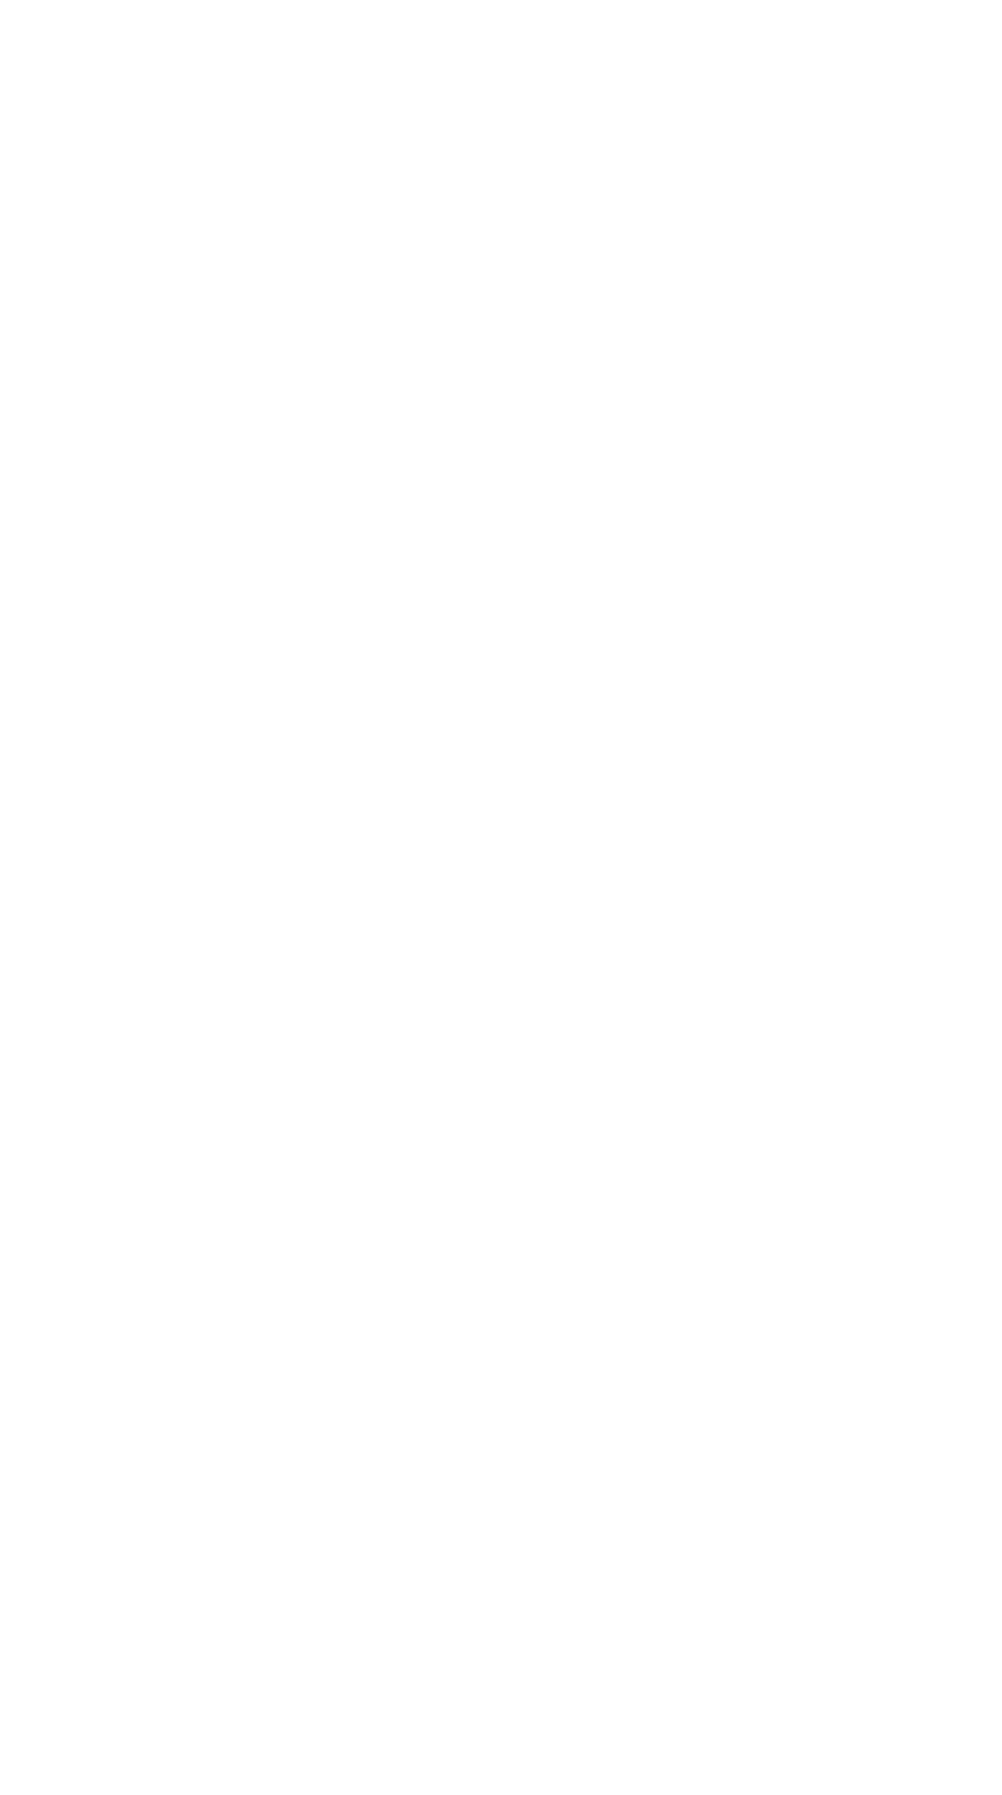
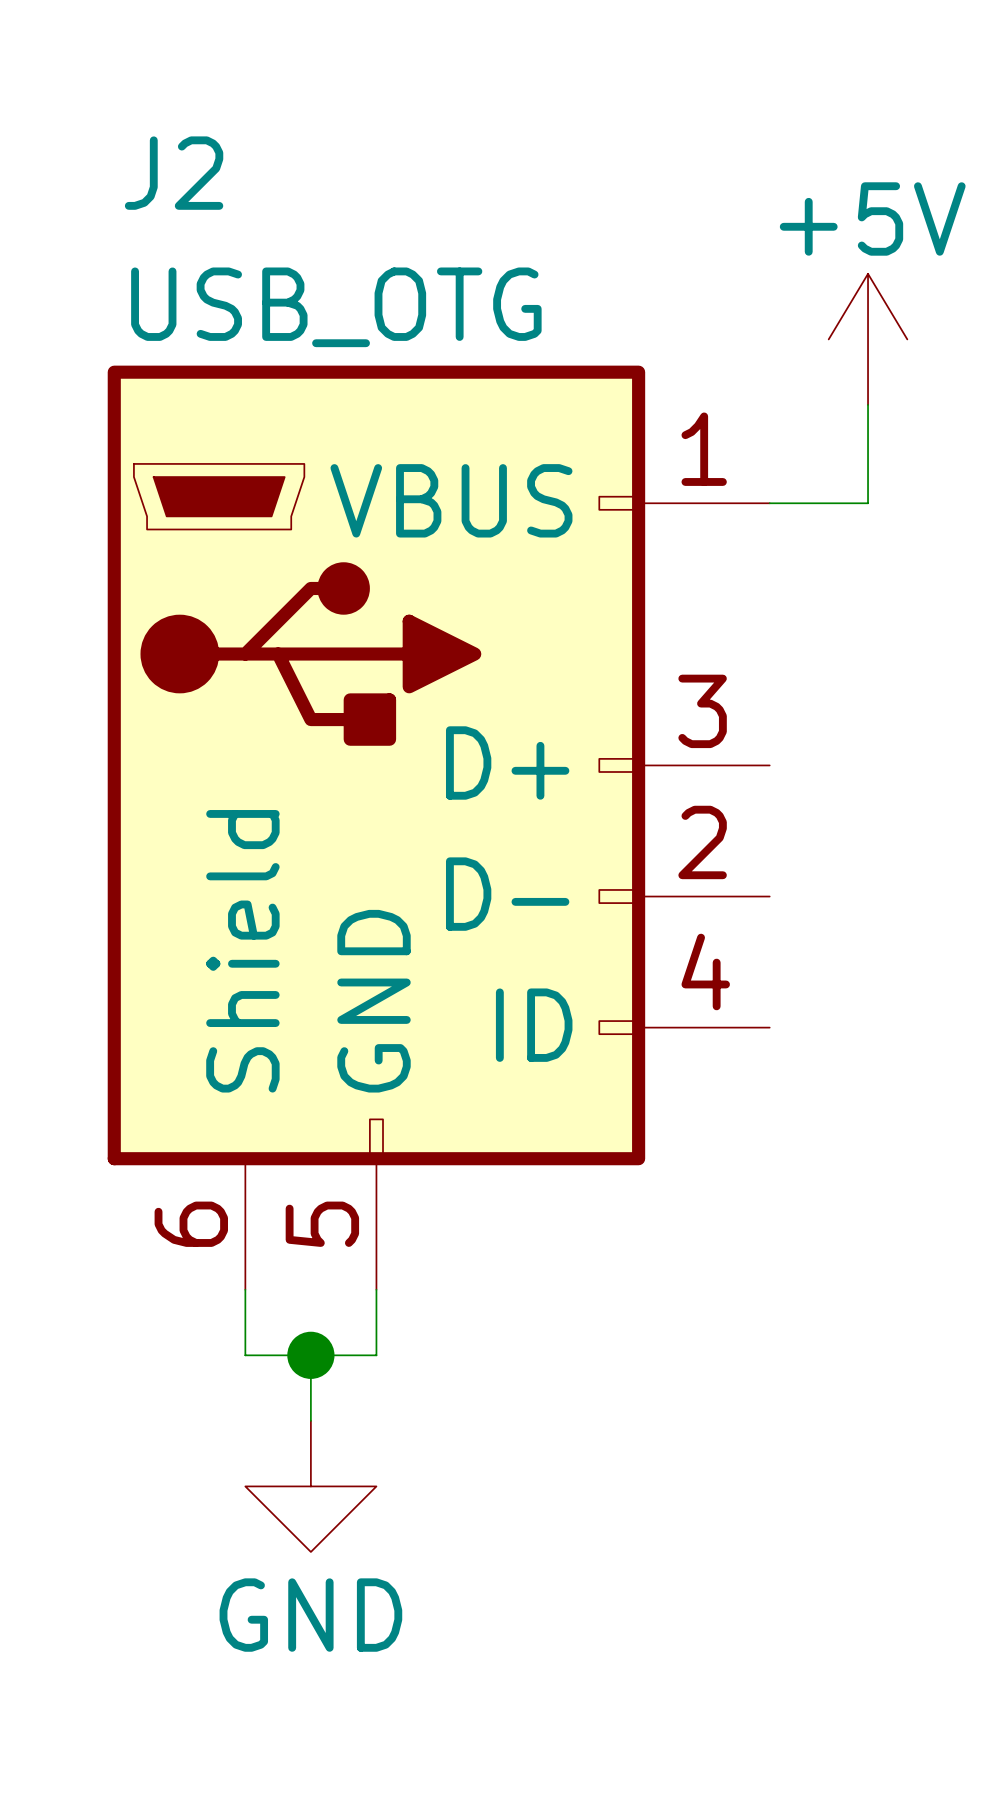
power symbol: none -> +5V (868, 339)
wire: none -> (868, 404) (868, 503) (769, 503)
J2: none -> USB_OTG (438, 827)
wire: none -> (245, 1289) (245, 1355) (376, 1355) (376, 1289)
wire: none -> (310, 1355) (310, 1420)
junction: none -> (310, 1355)
power symbol: none -> GND (310, 1486)

